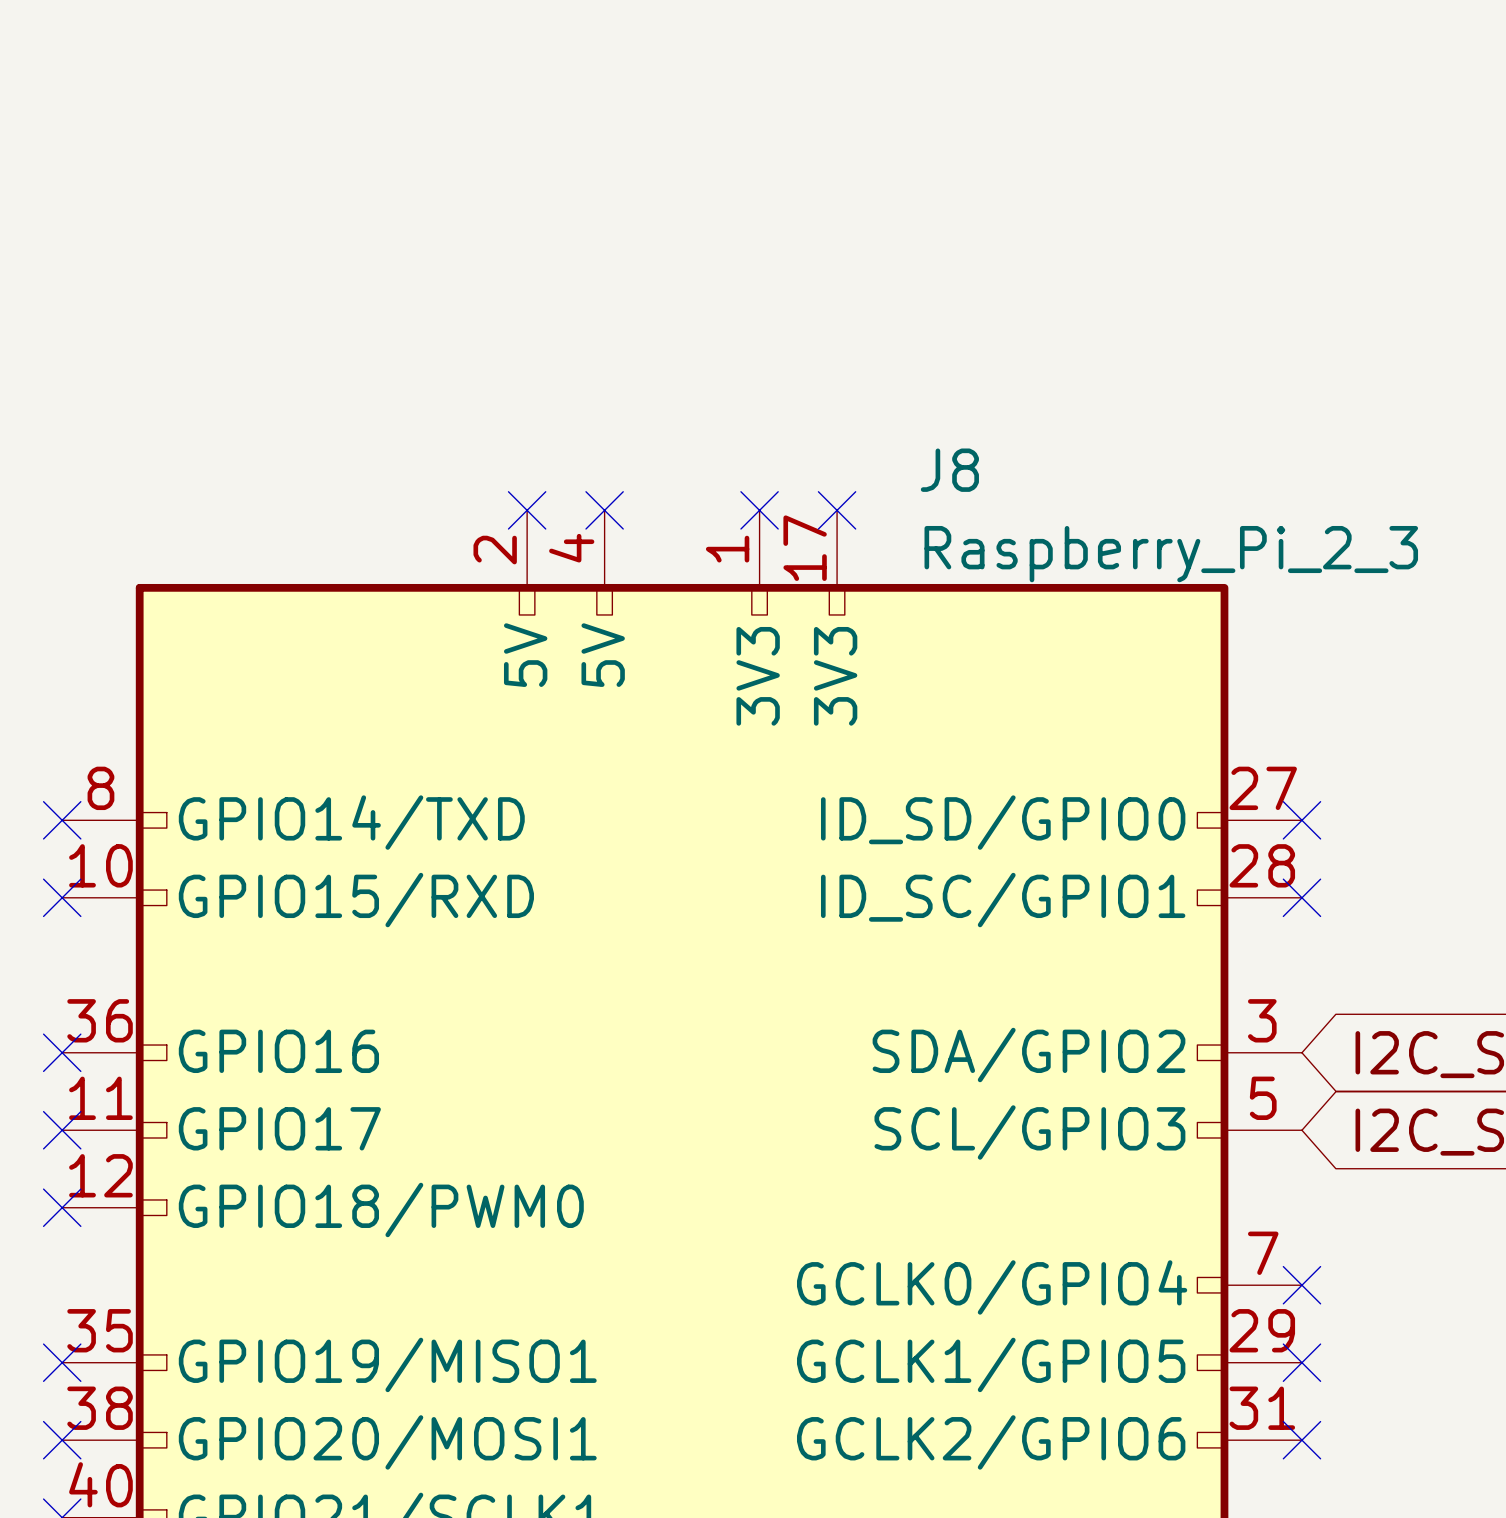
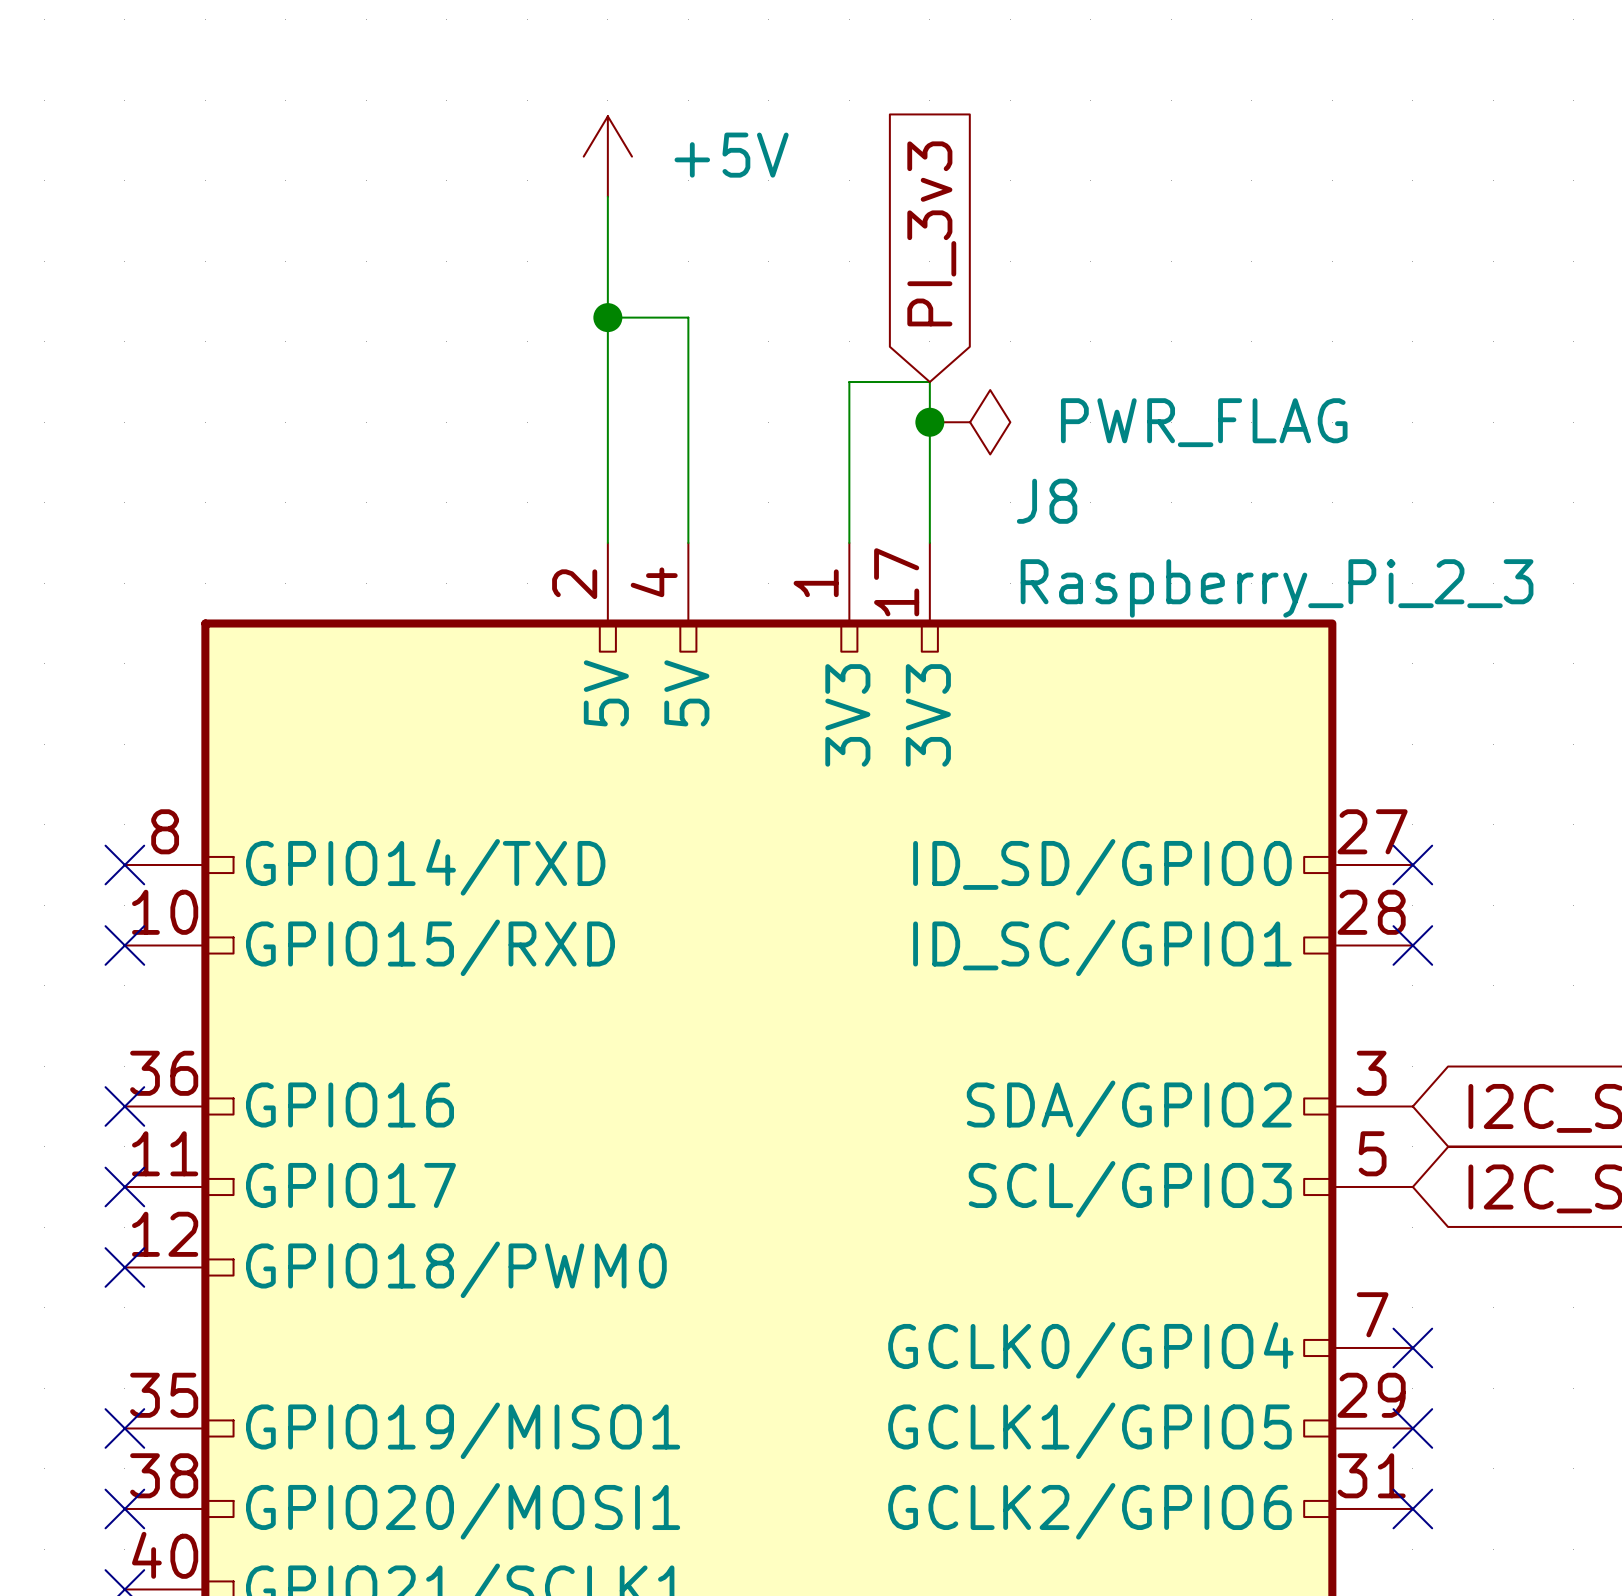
power symbol: none -> +5V (607, 156)
wire: none -> (607, 196) (607, 543)
global label: none -> PI_3v3 (931, 233)
wire: none -> (607, 317) (688, 317) (688, 543)
junction: none -> (607, 317)
junction: none -> (929, 422)
power symbol: none -> PWR_FLAG (970, 422)
no-connect mark: (527, 510) -> none
no-connect mark: (604, 510) -> none
wire: none -> (849, 543) (849, 382) (929, 382) (929, 543)
no-connect mark: (759, 510) -> none
no-connect mark: (837, 510) -> none

